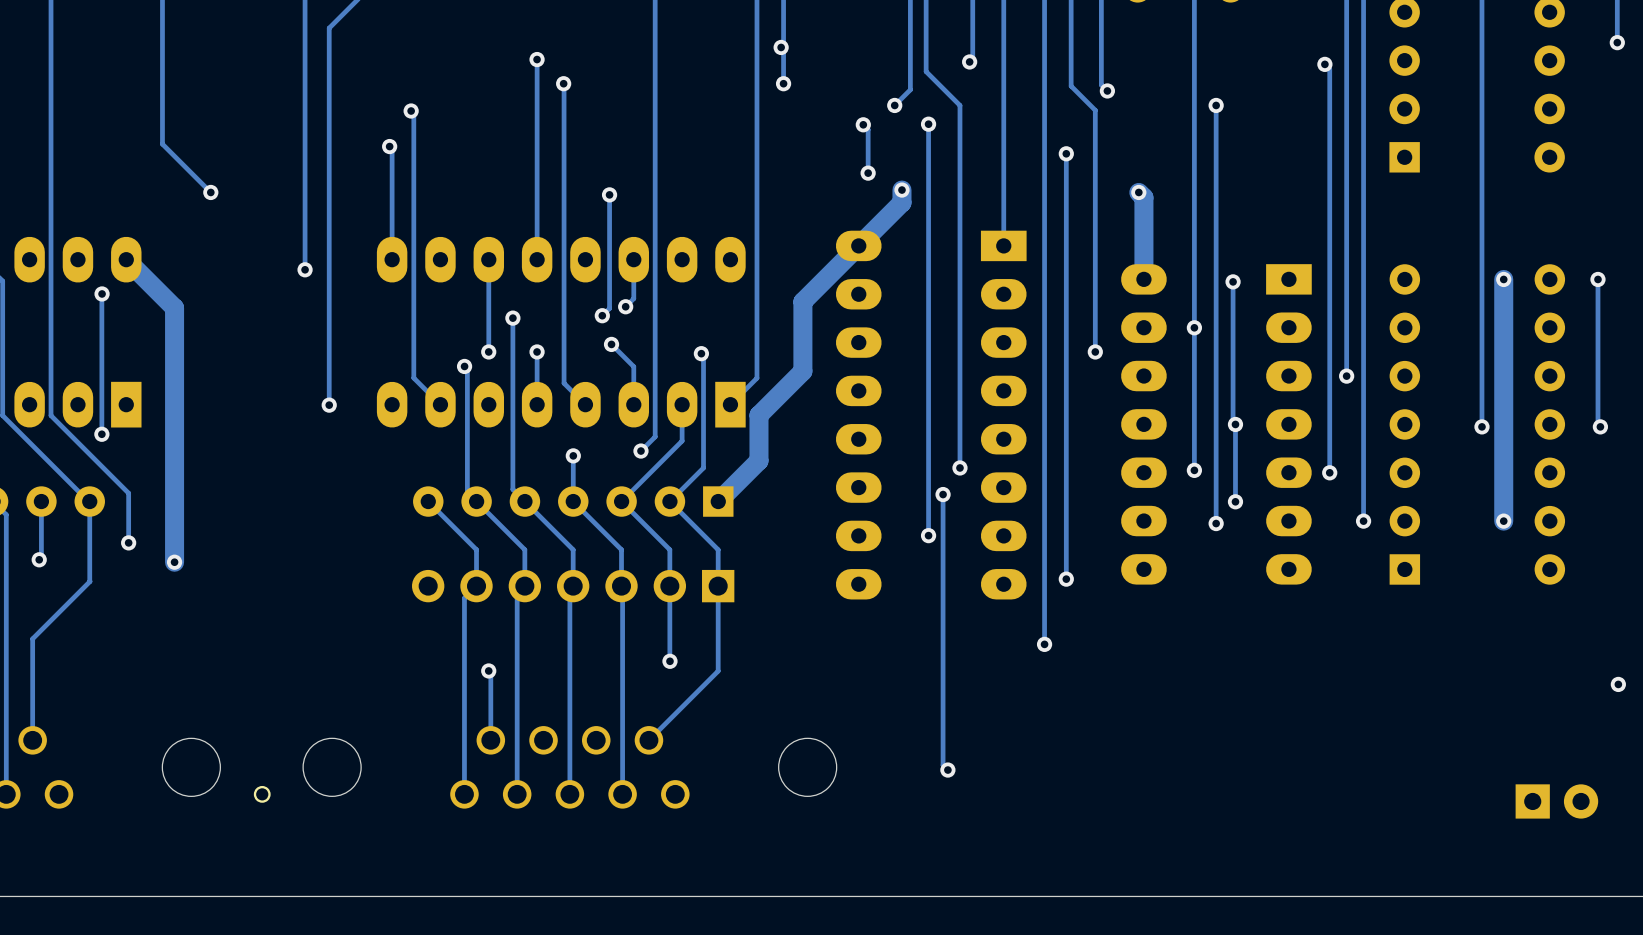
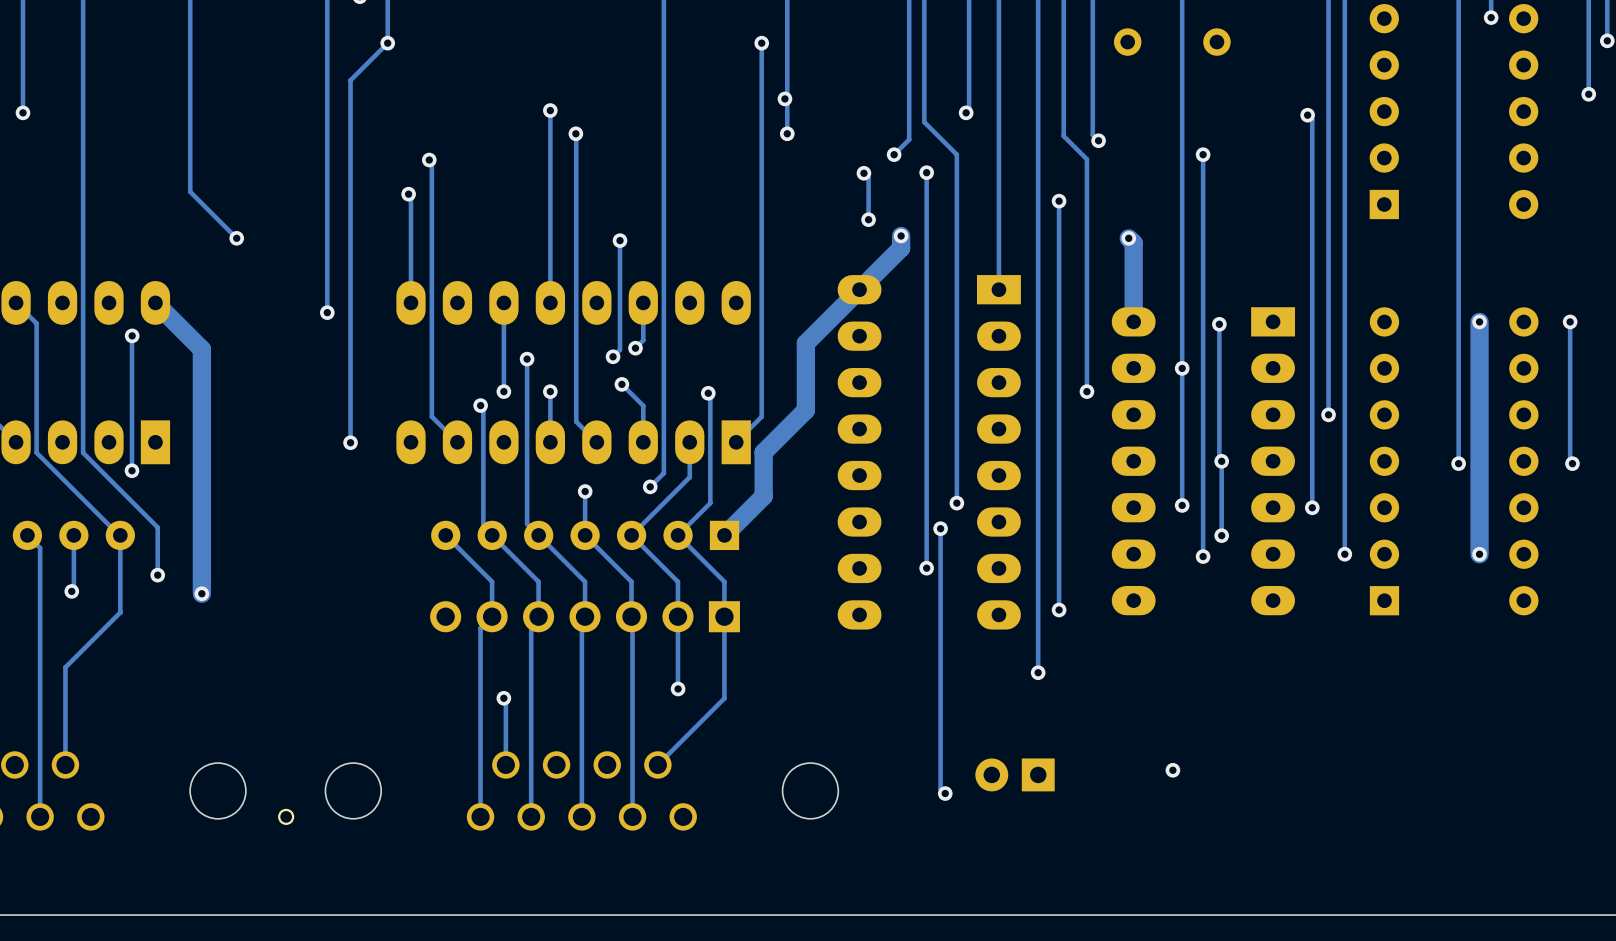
via: (1618, 684) -> none
via: none -> (1172, 770)
part: none -> (1015, 774)
part: (1556, 801) -> none

